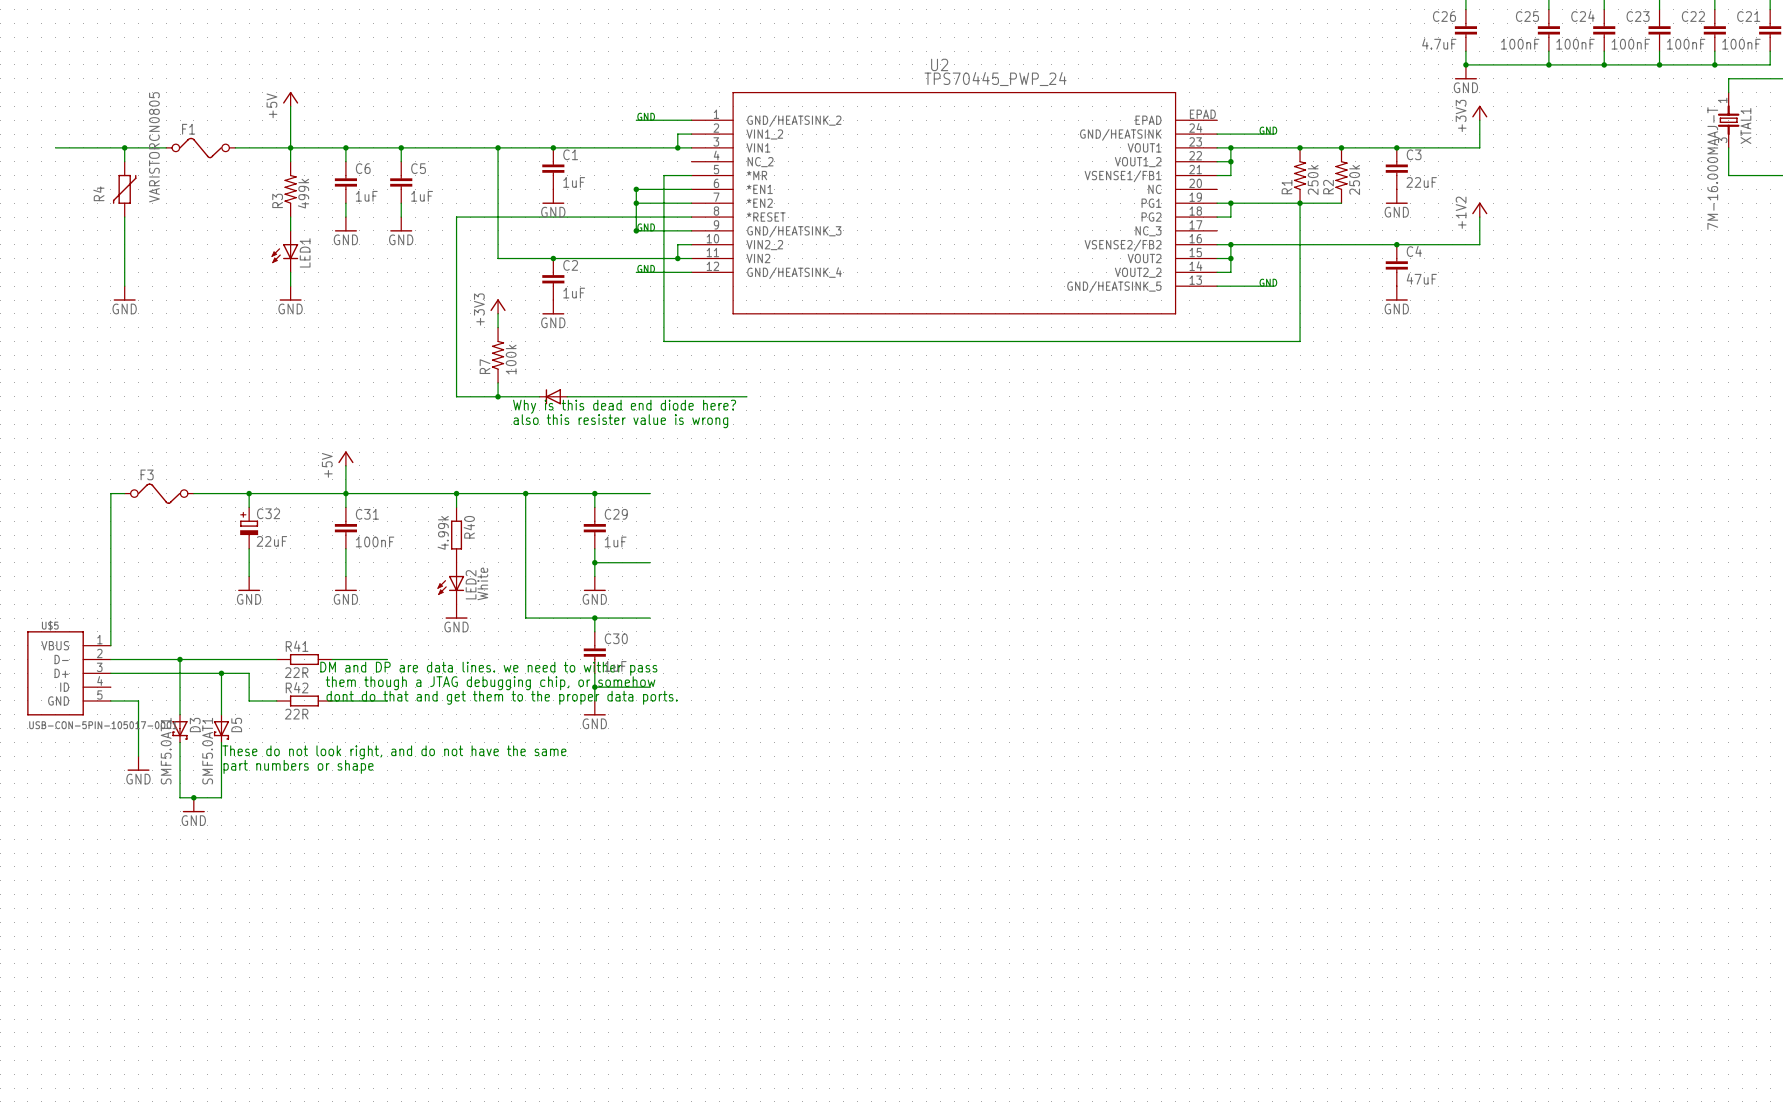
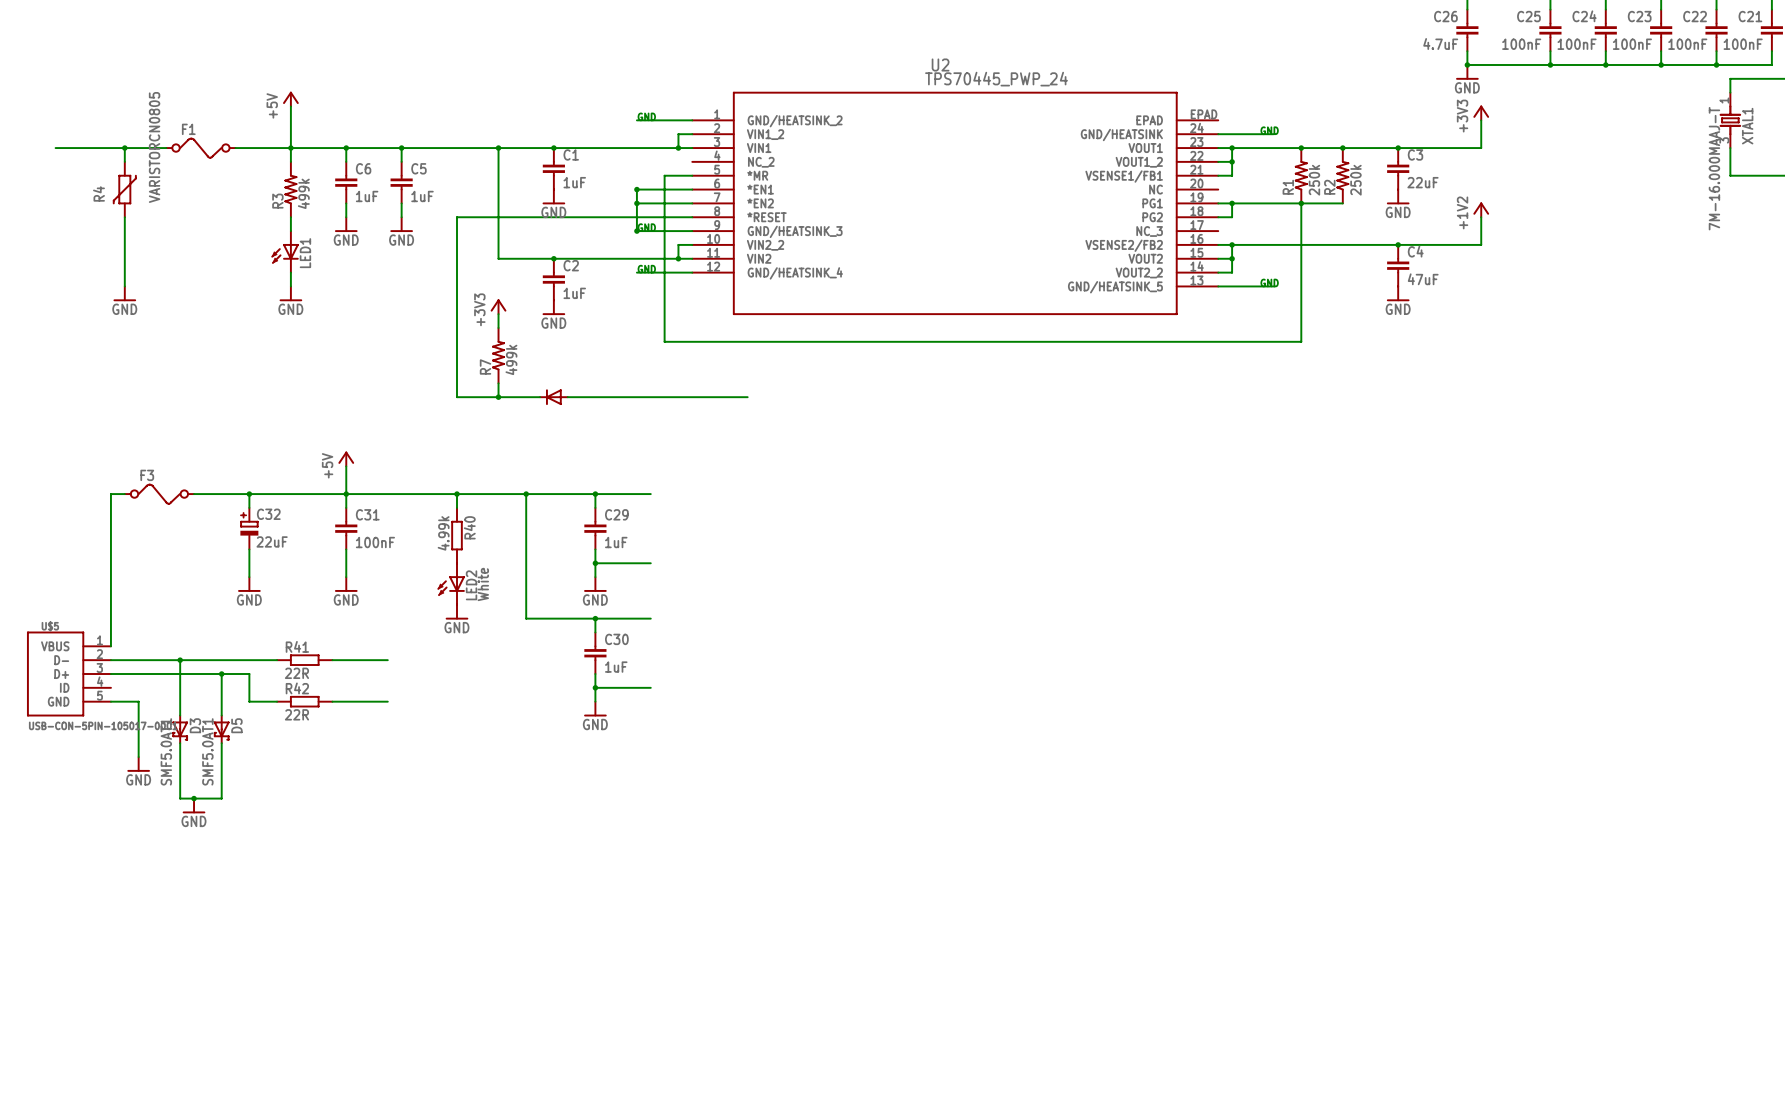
R7 value: 100k (511, 359) -> 499k (511, 359)
text: Why is this dead end diode here? (624, 406) -> none
text: also this resister value is wrong (620, 421) -> none
text: DM and DP are data lines. we need to wither pass (488, 668) -> none
text: them though a JTAG debugging chip, or somehow (490, 683) -> none
text: dont do that and get them to the proper data ports. (502, 697) -> none
text: These do not look right, and do not have the same (394, 752) -> none
text: part numbers or shape (298, 766) -> none

